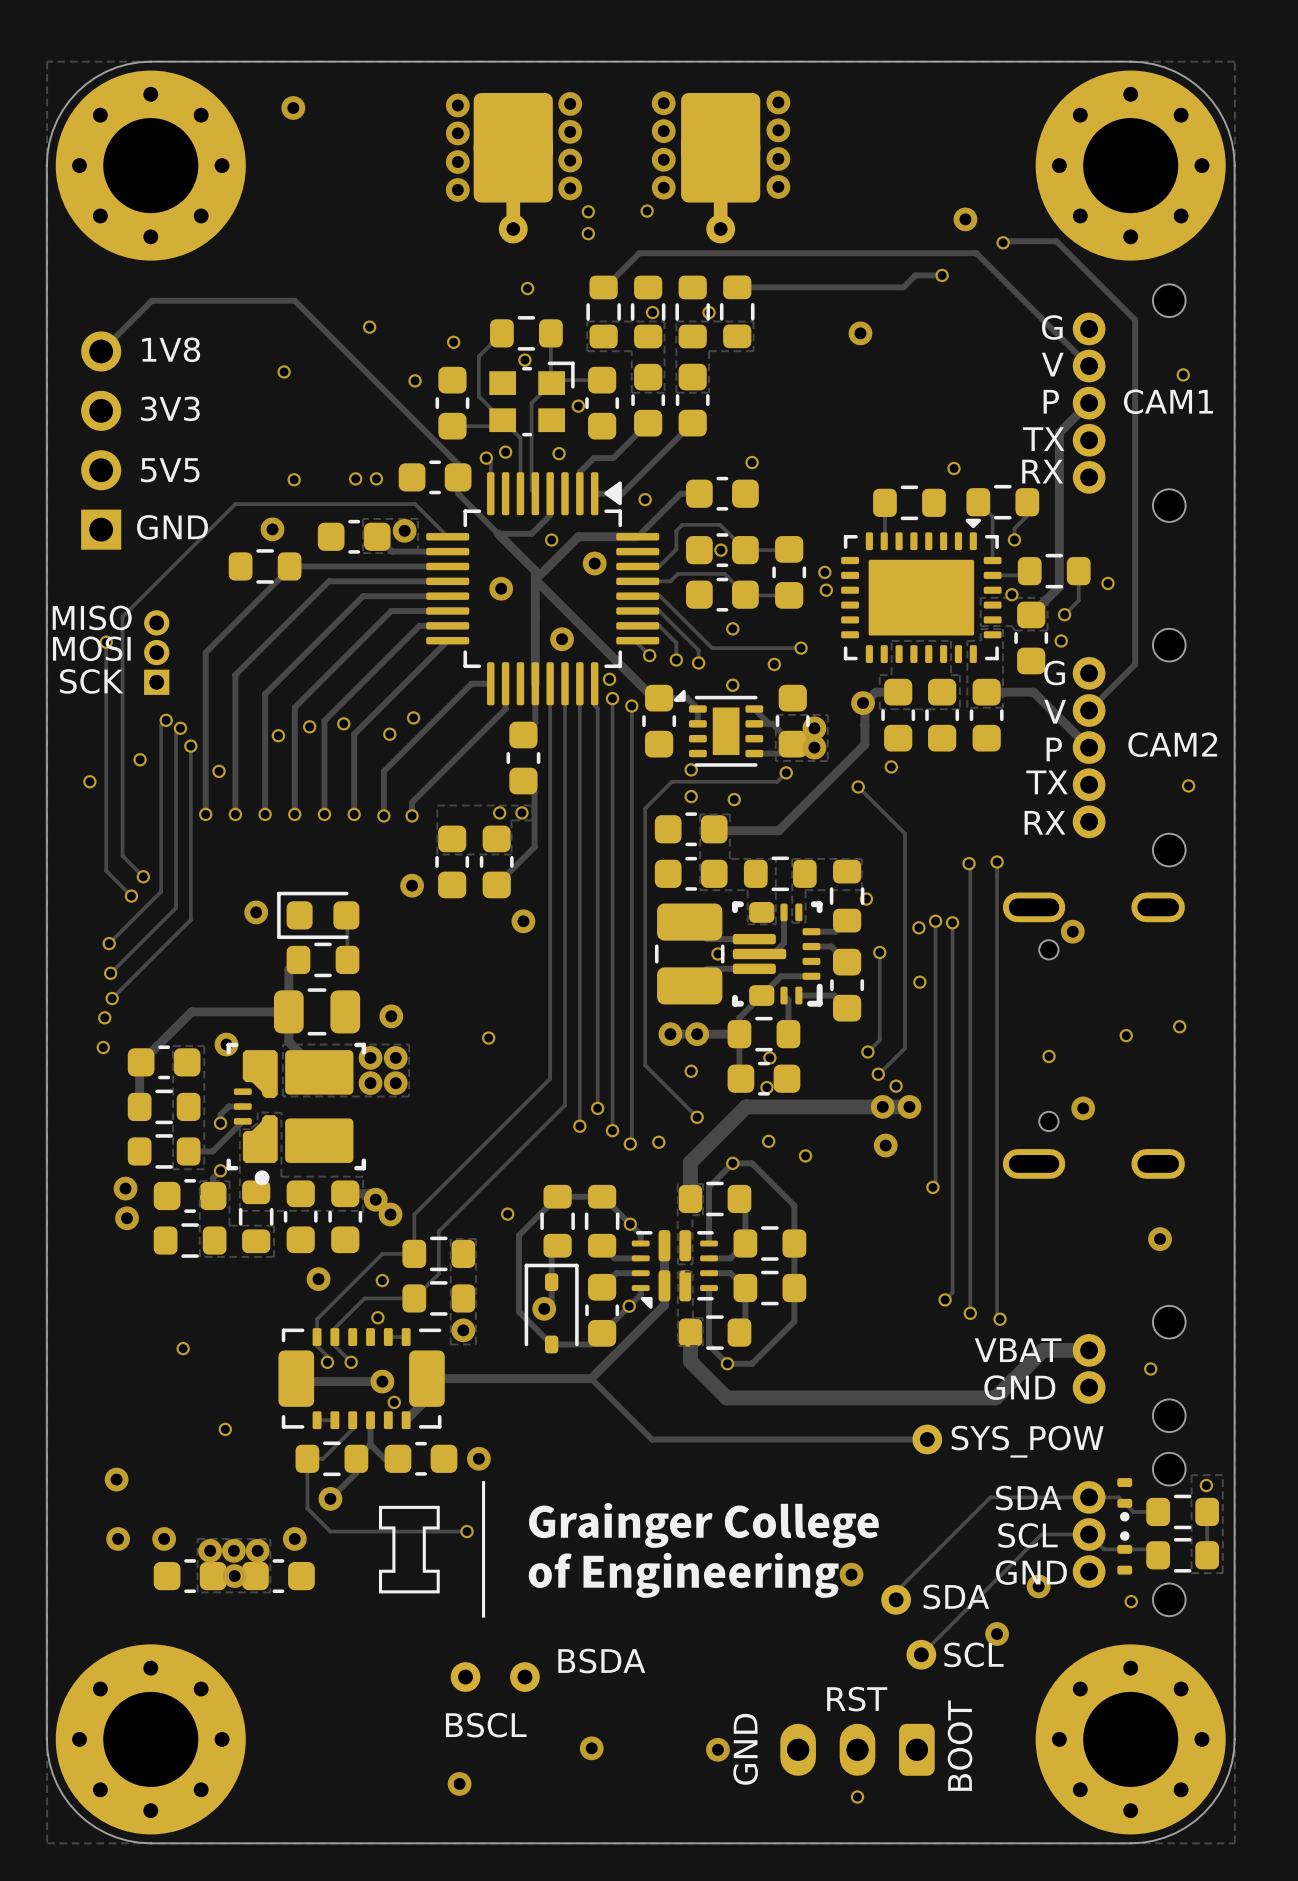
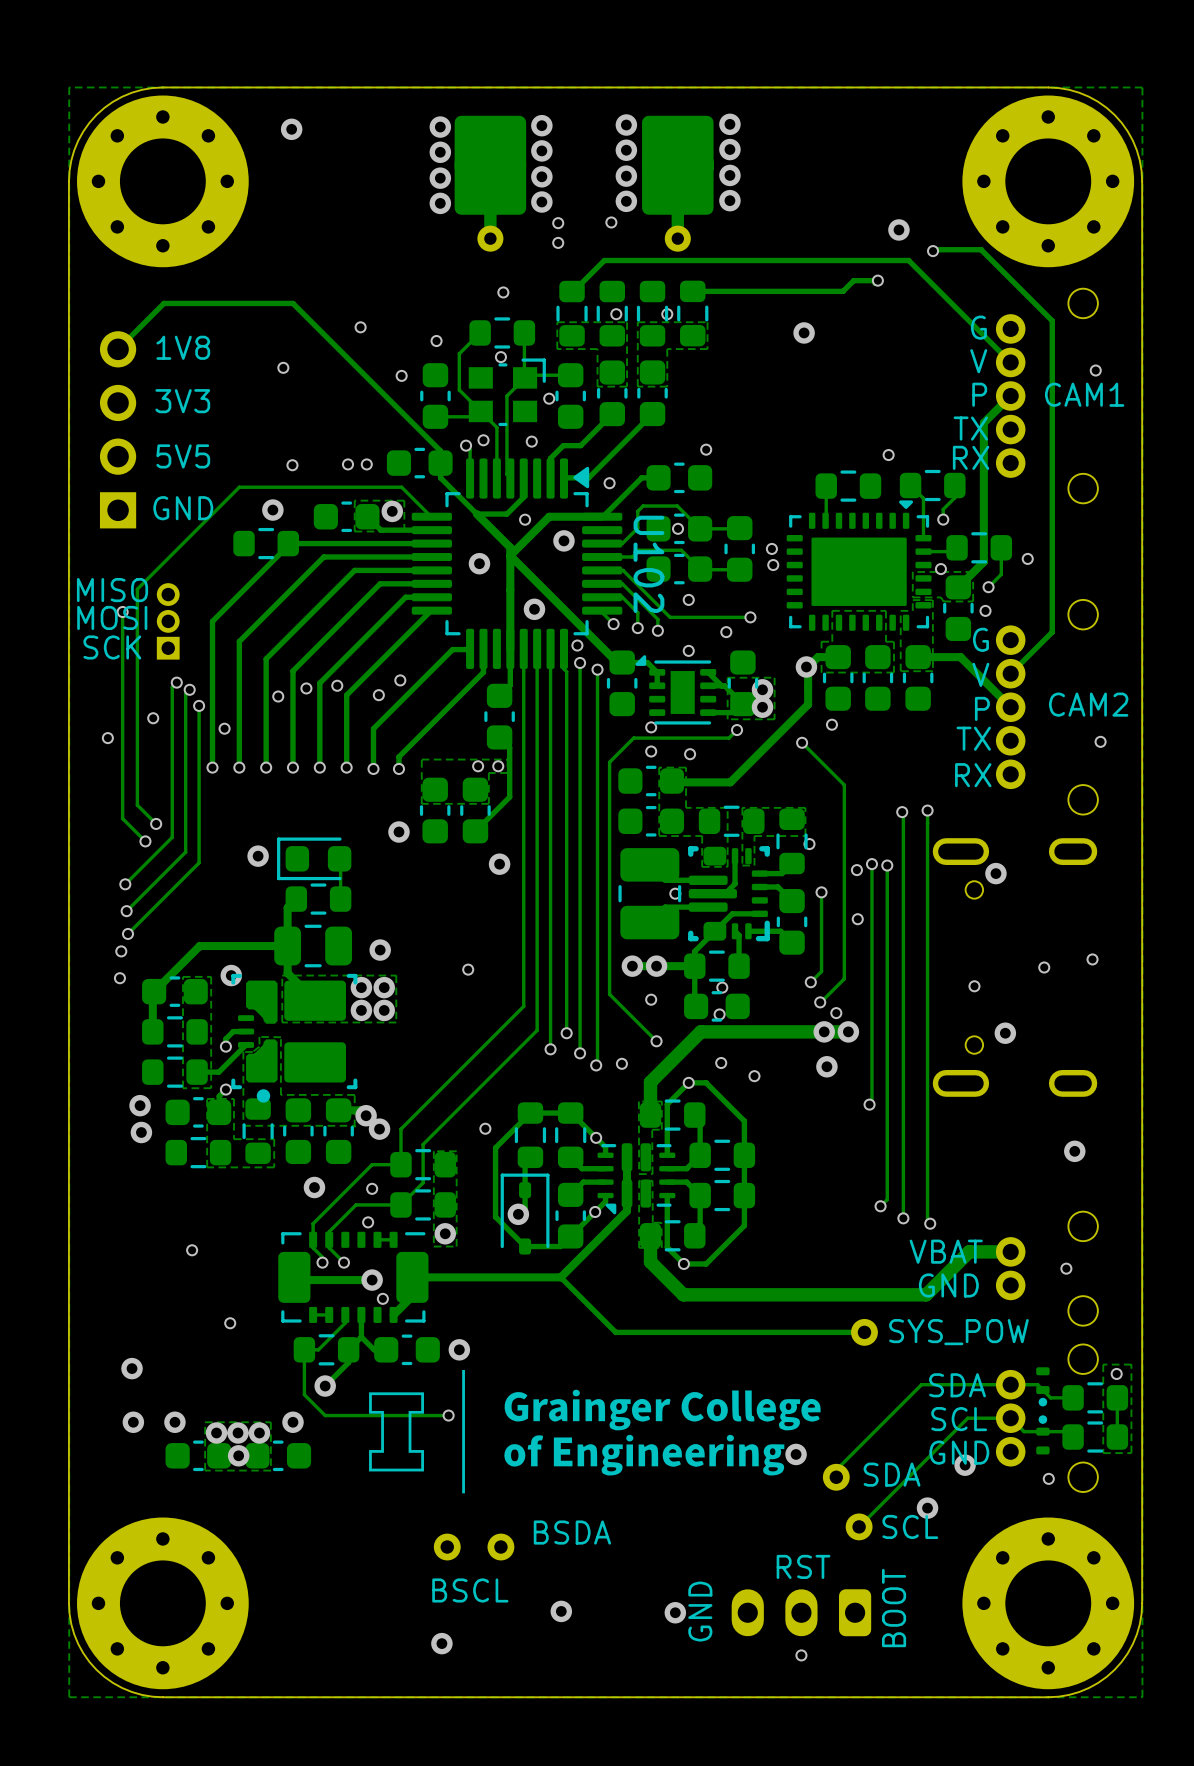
part: (542, 588) -> none
U102: none -> (517, 563)

